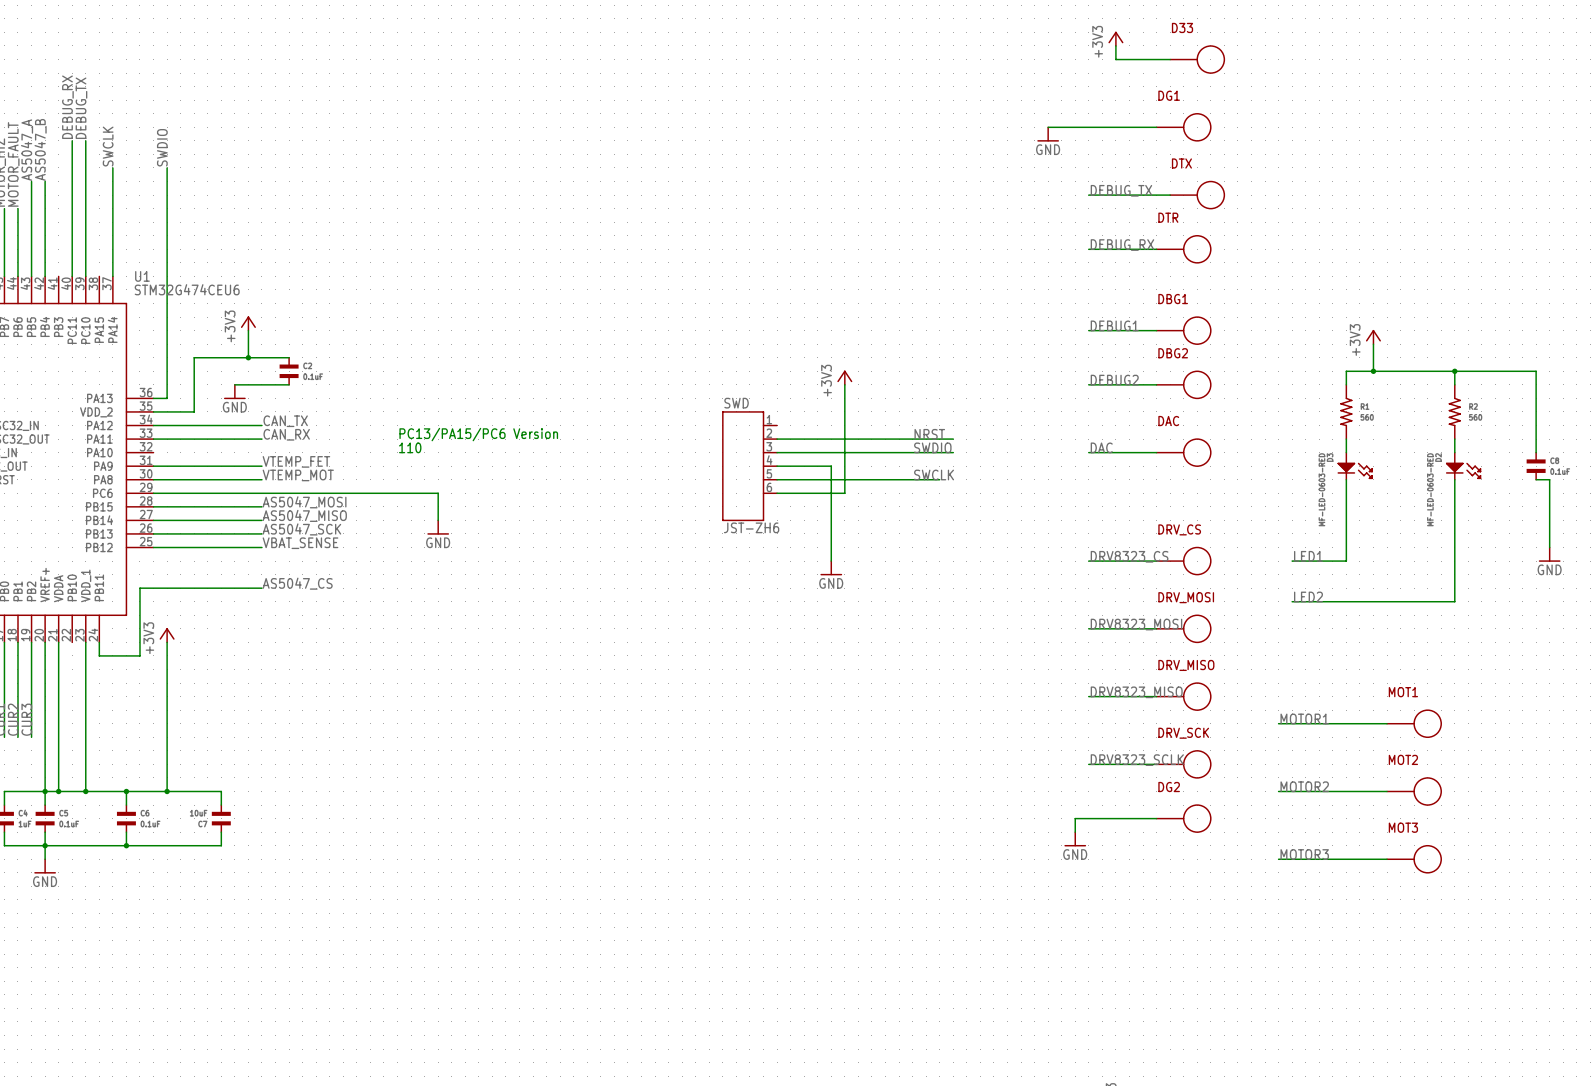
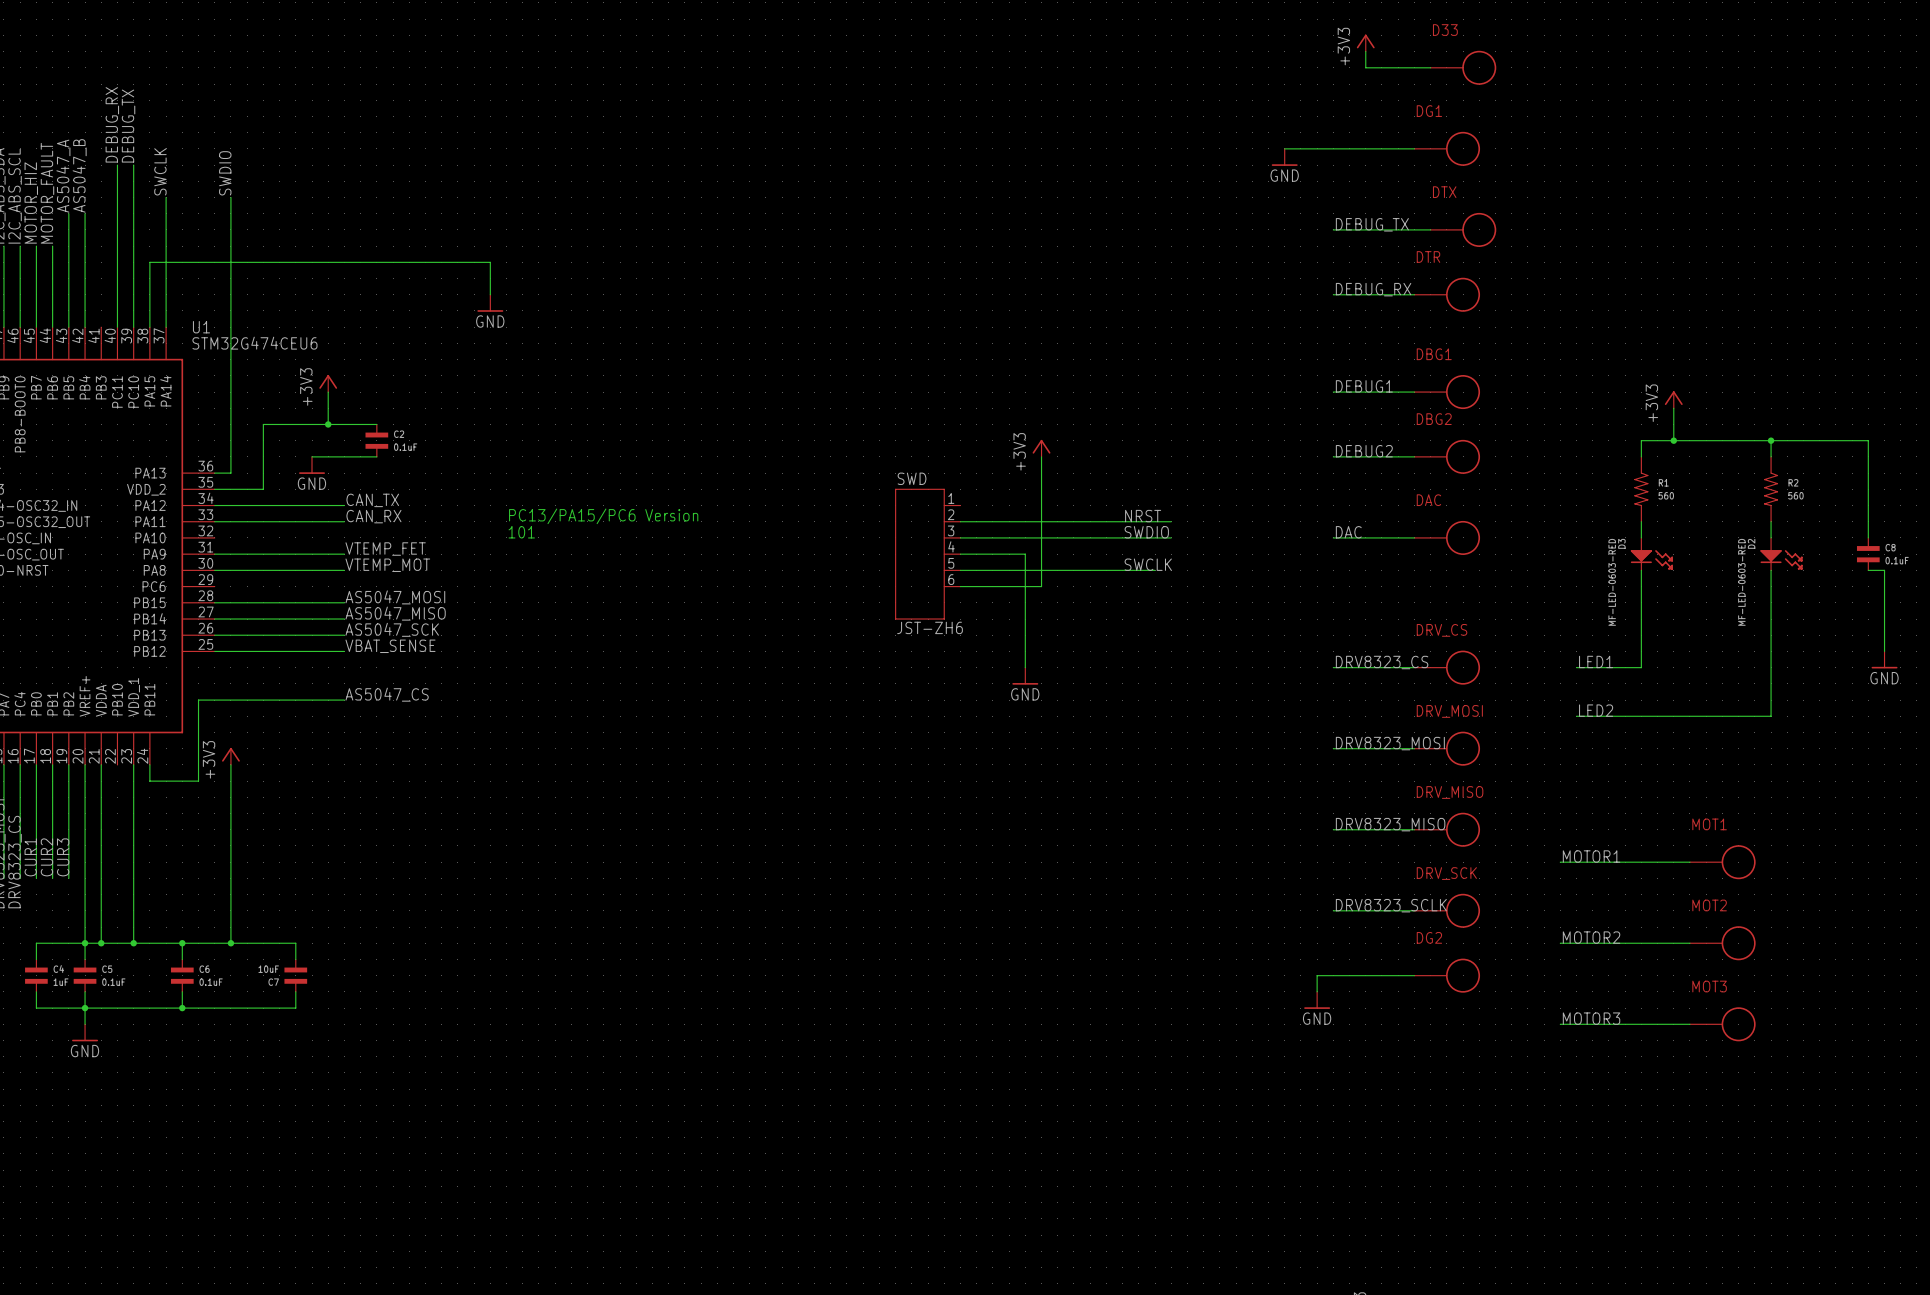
wire: none -> (490, 294) (490, 262) (149, 262) (149, 327)
power symbol: none -> GND (490, 303)
text: 110 (410, 447) -> 101 (521, 532)
wire: (153, 493) (438, 493) (438, 520) -> none
power symbol: GND (438, 527) -> none

